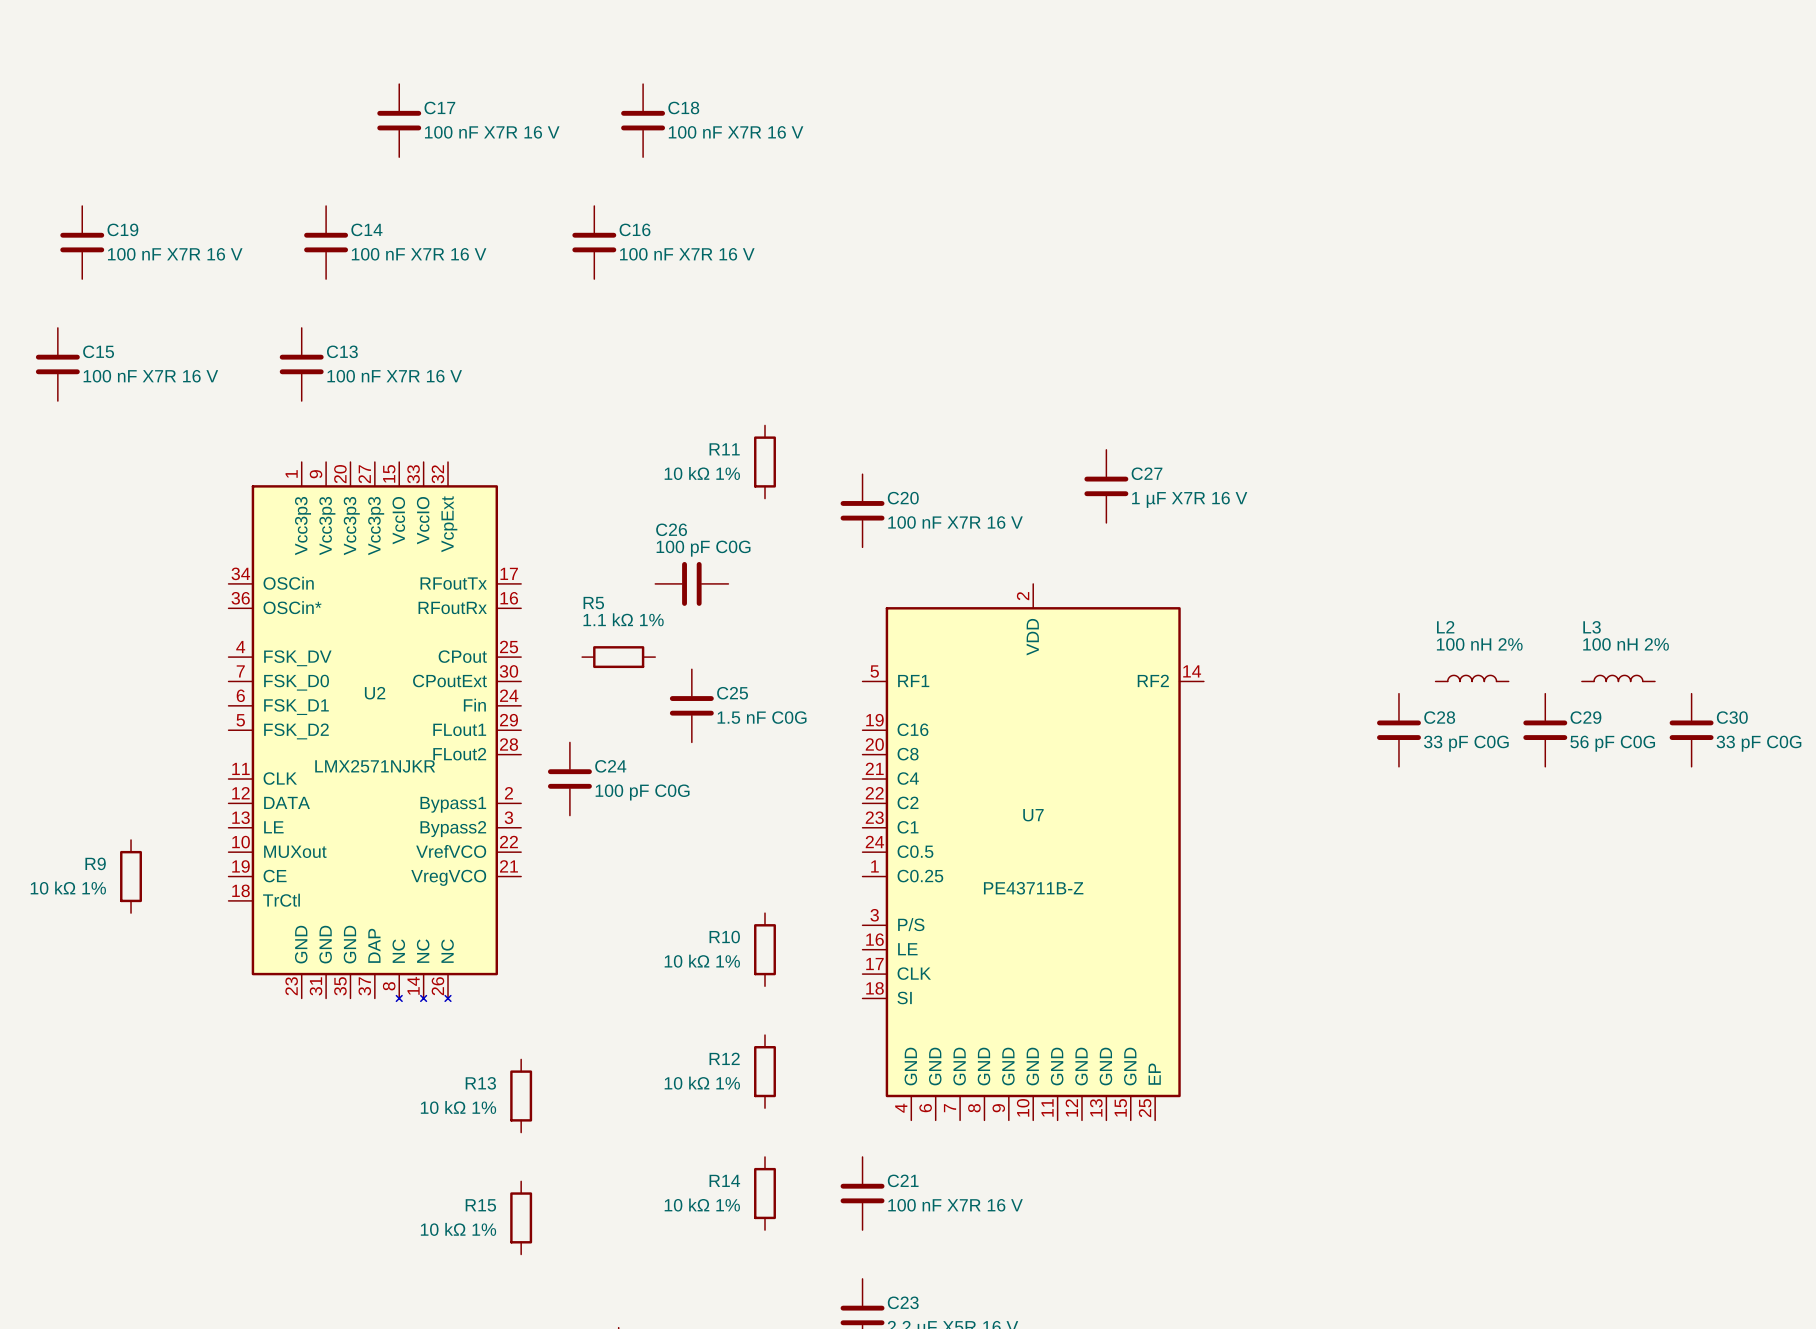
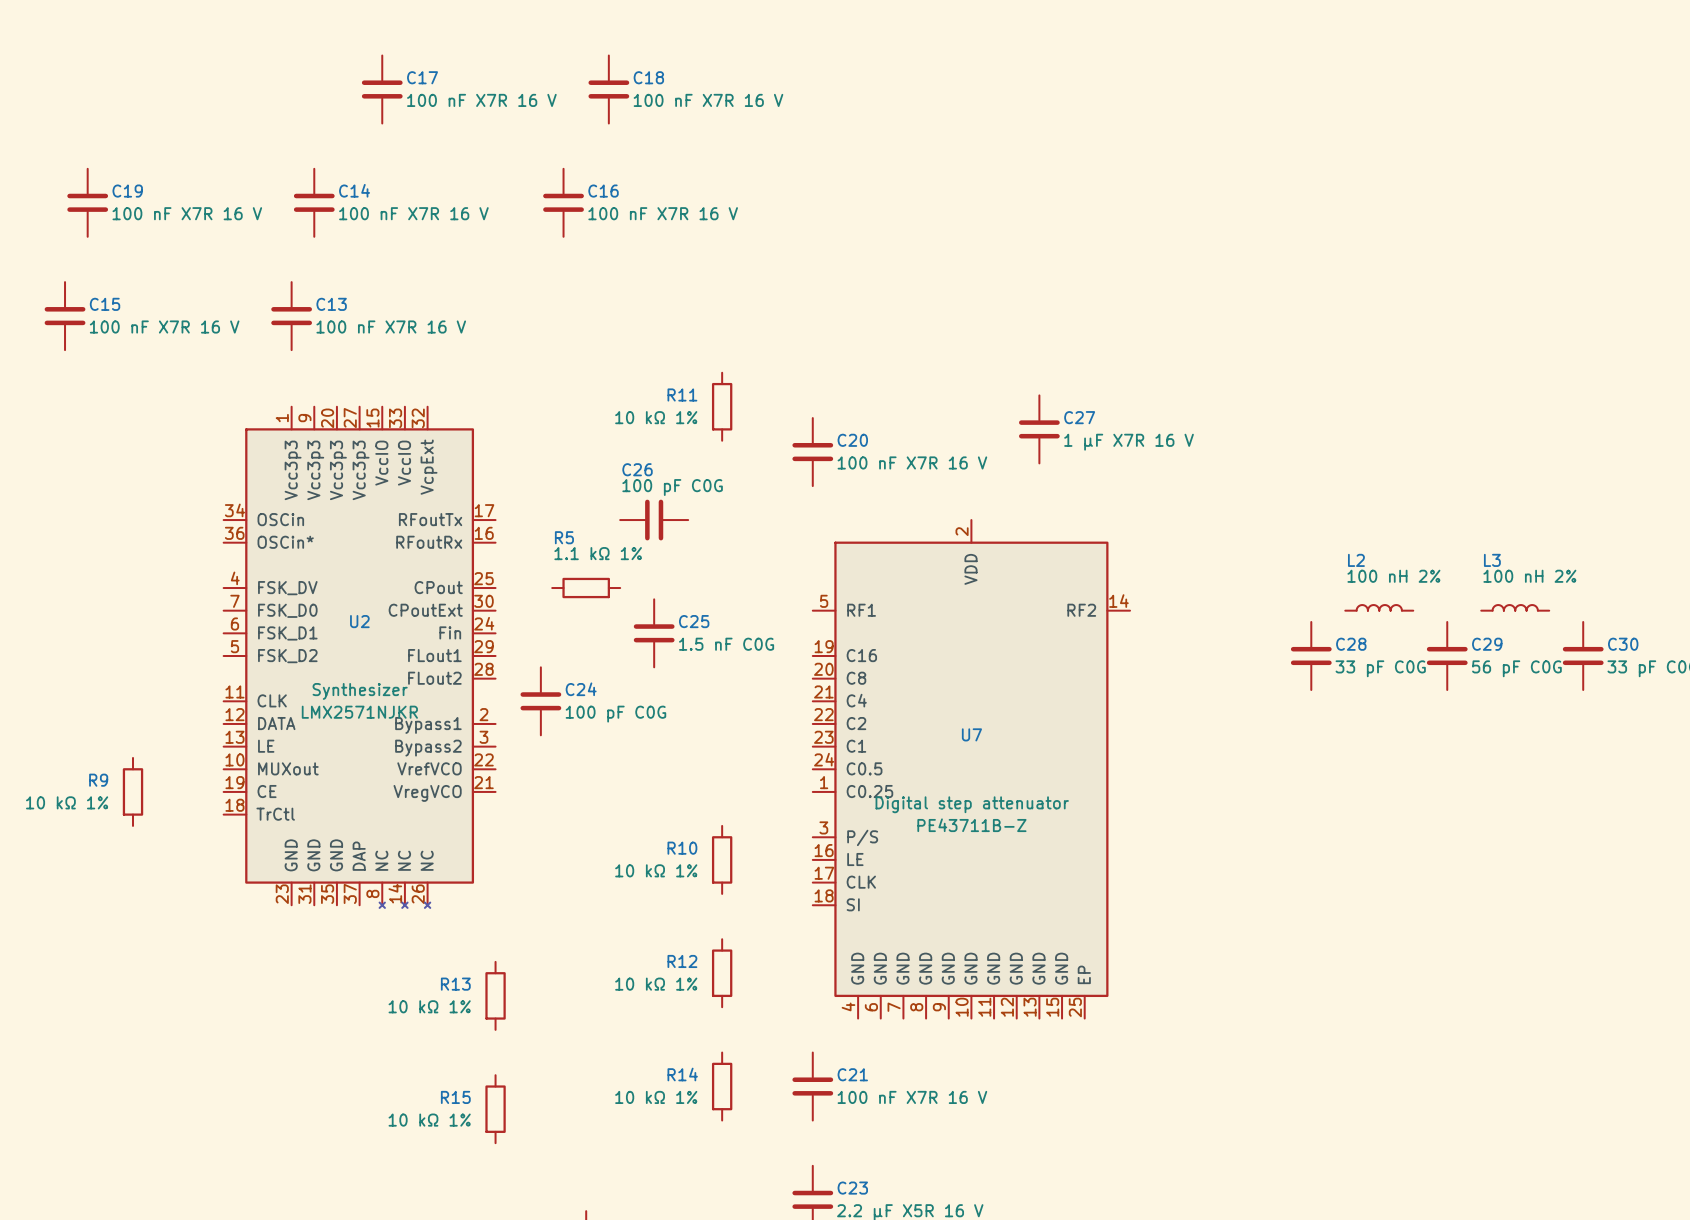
U2 value: LMX2571NJKR (375, 766) -> Synthesizer (360, 691)
U2 text: none -> LMX2571NJKR (359, 712)
U7 value: PE43711B-Z (1033, 888) -> Digital step attenuator (972, 804)
U7 text: none -> PE43711B-Z (971, 825)

